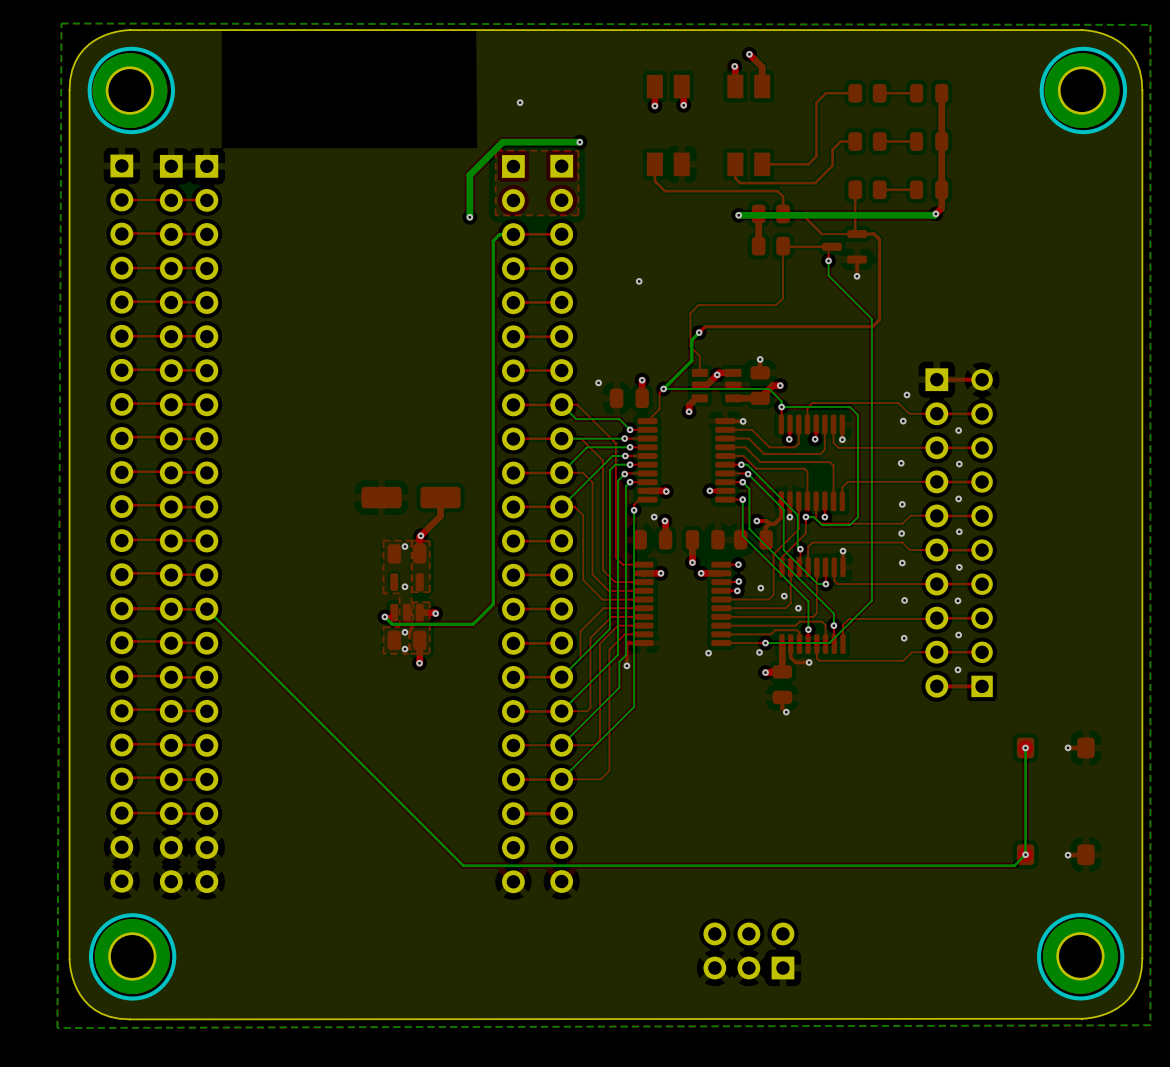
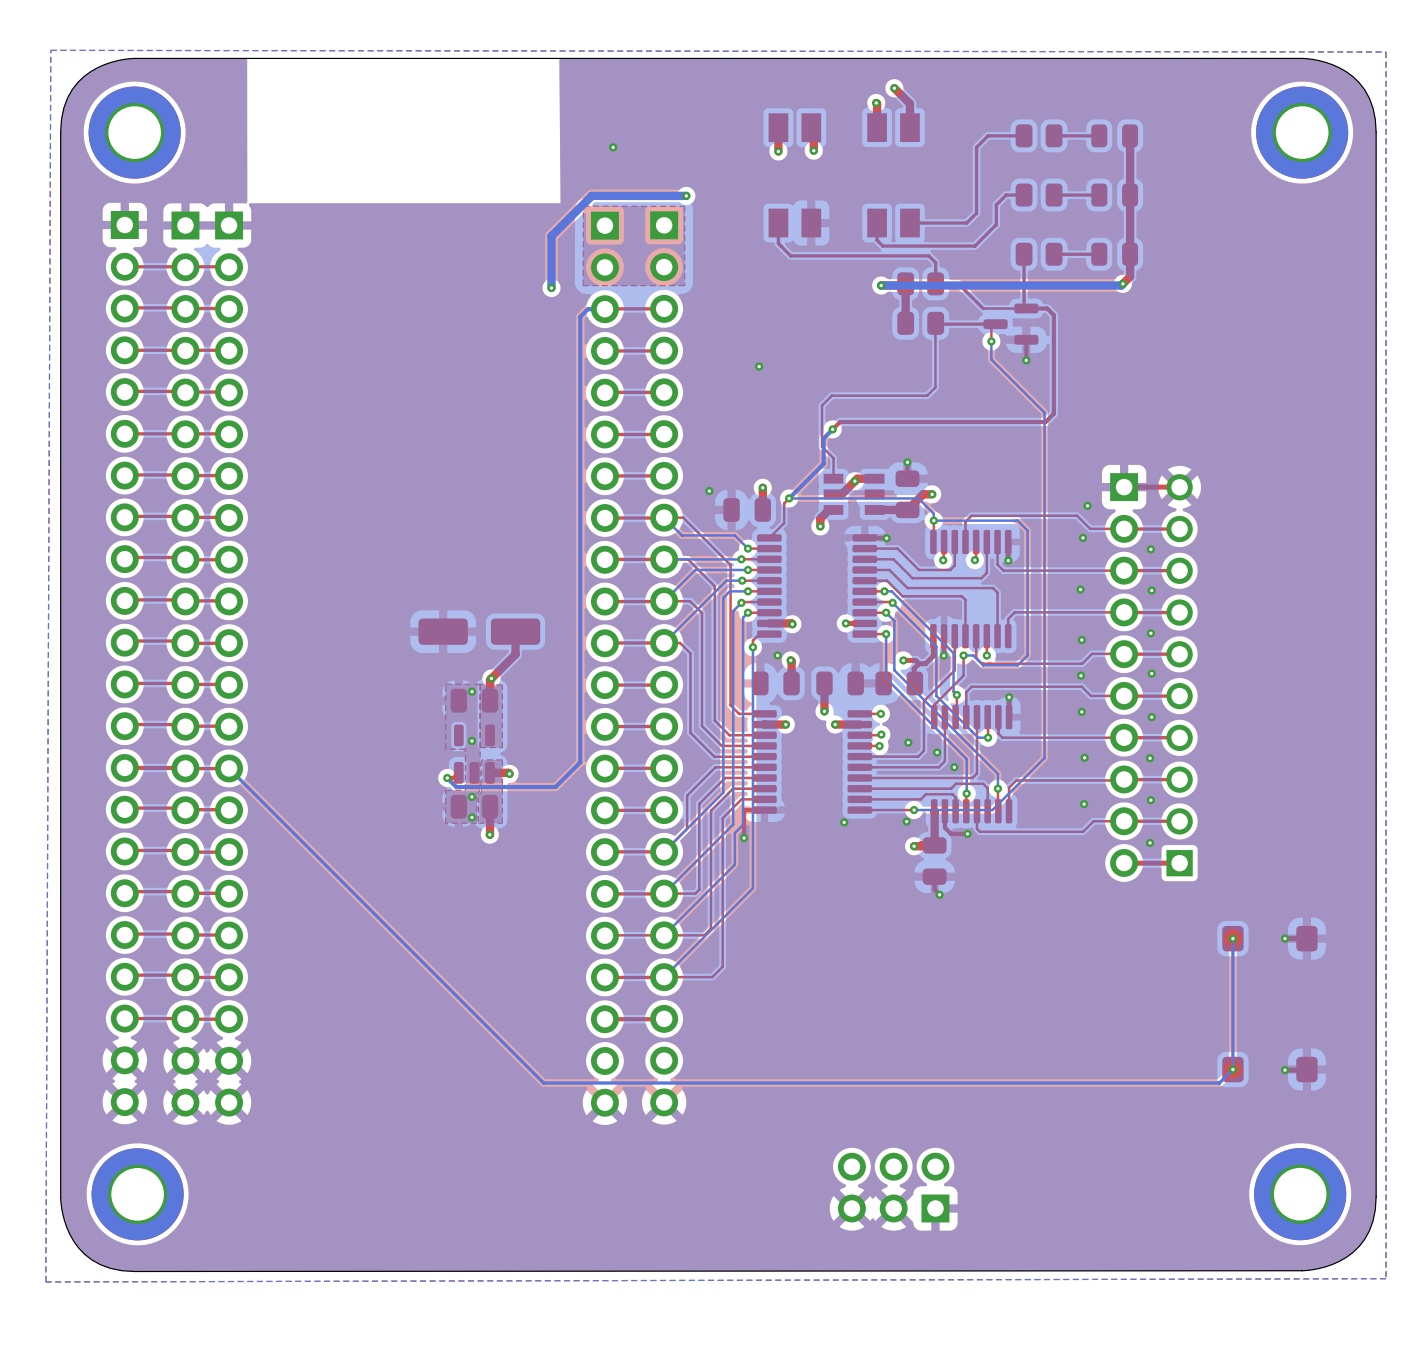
drawing: [87, 46, 175, 135] -> none
drawing: [1039, 46, 1128, 135] -> none
drawing: [88, 913, 177, 1001] -> none
drawing: [1037, 913, 1125, 1001] -> none

